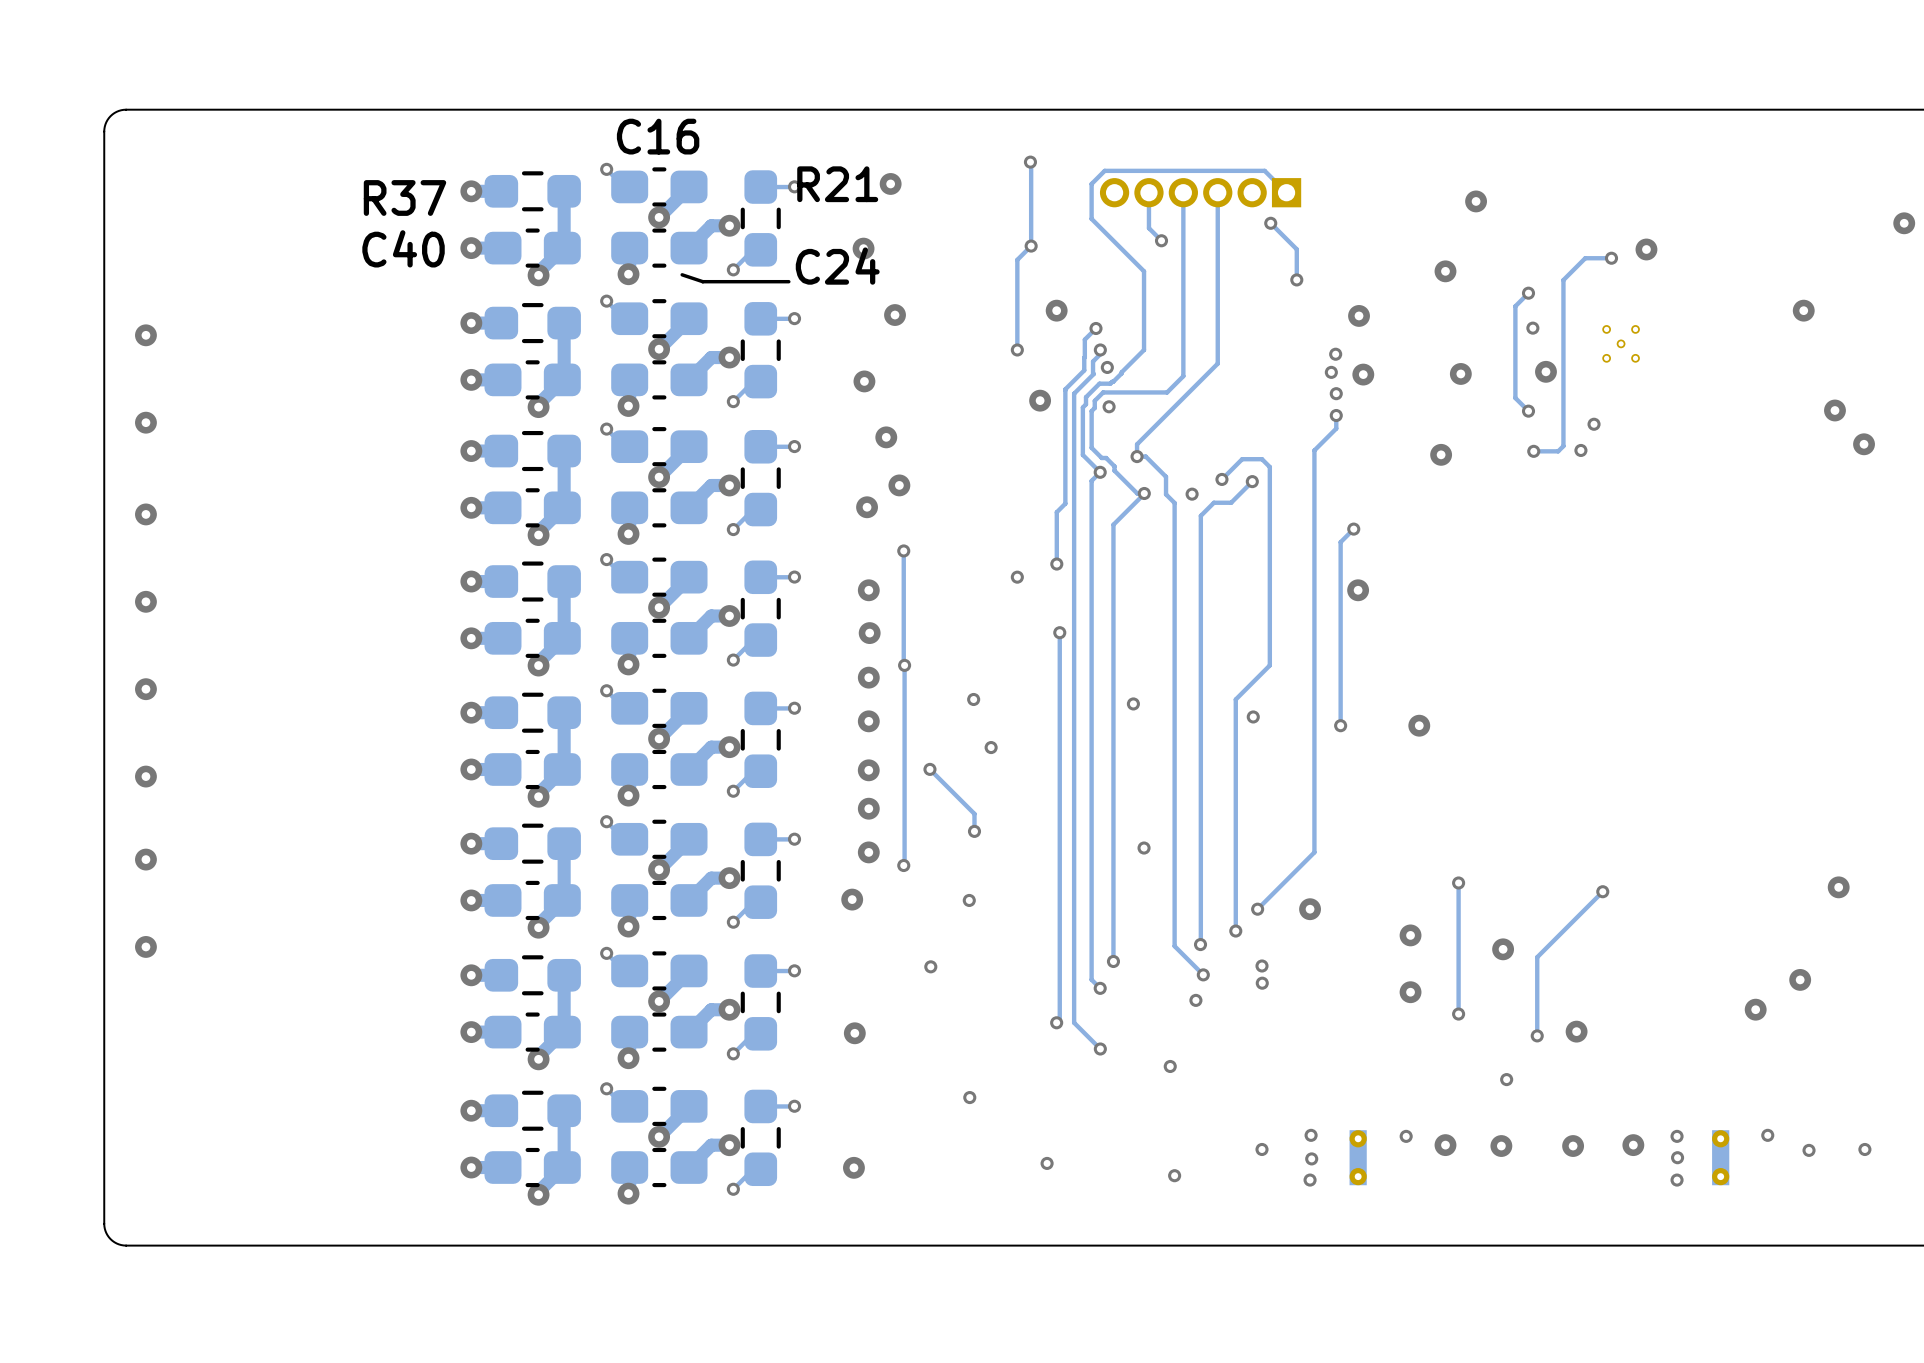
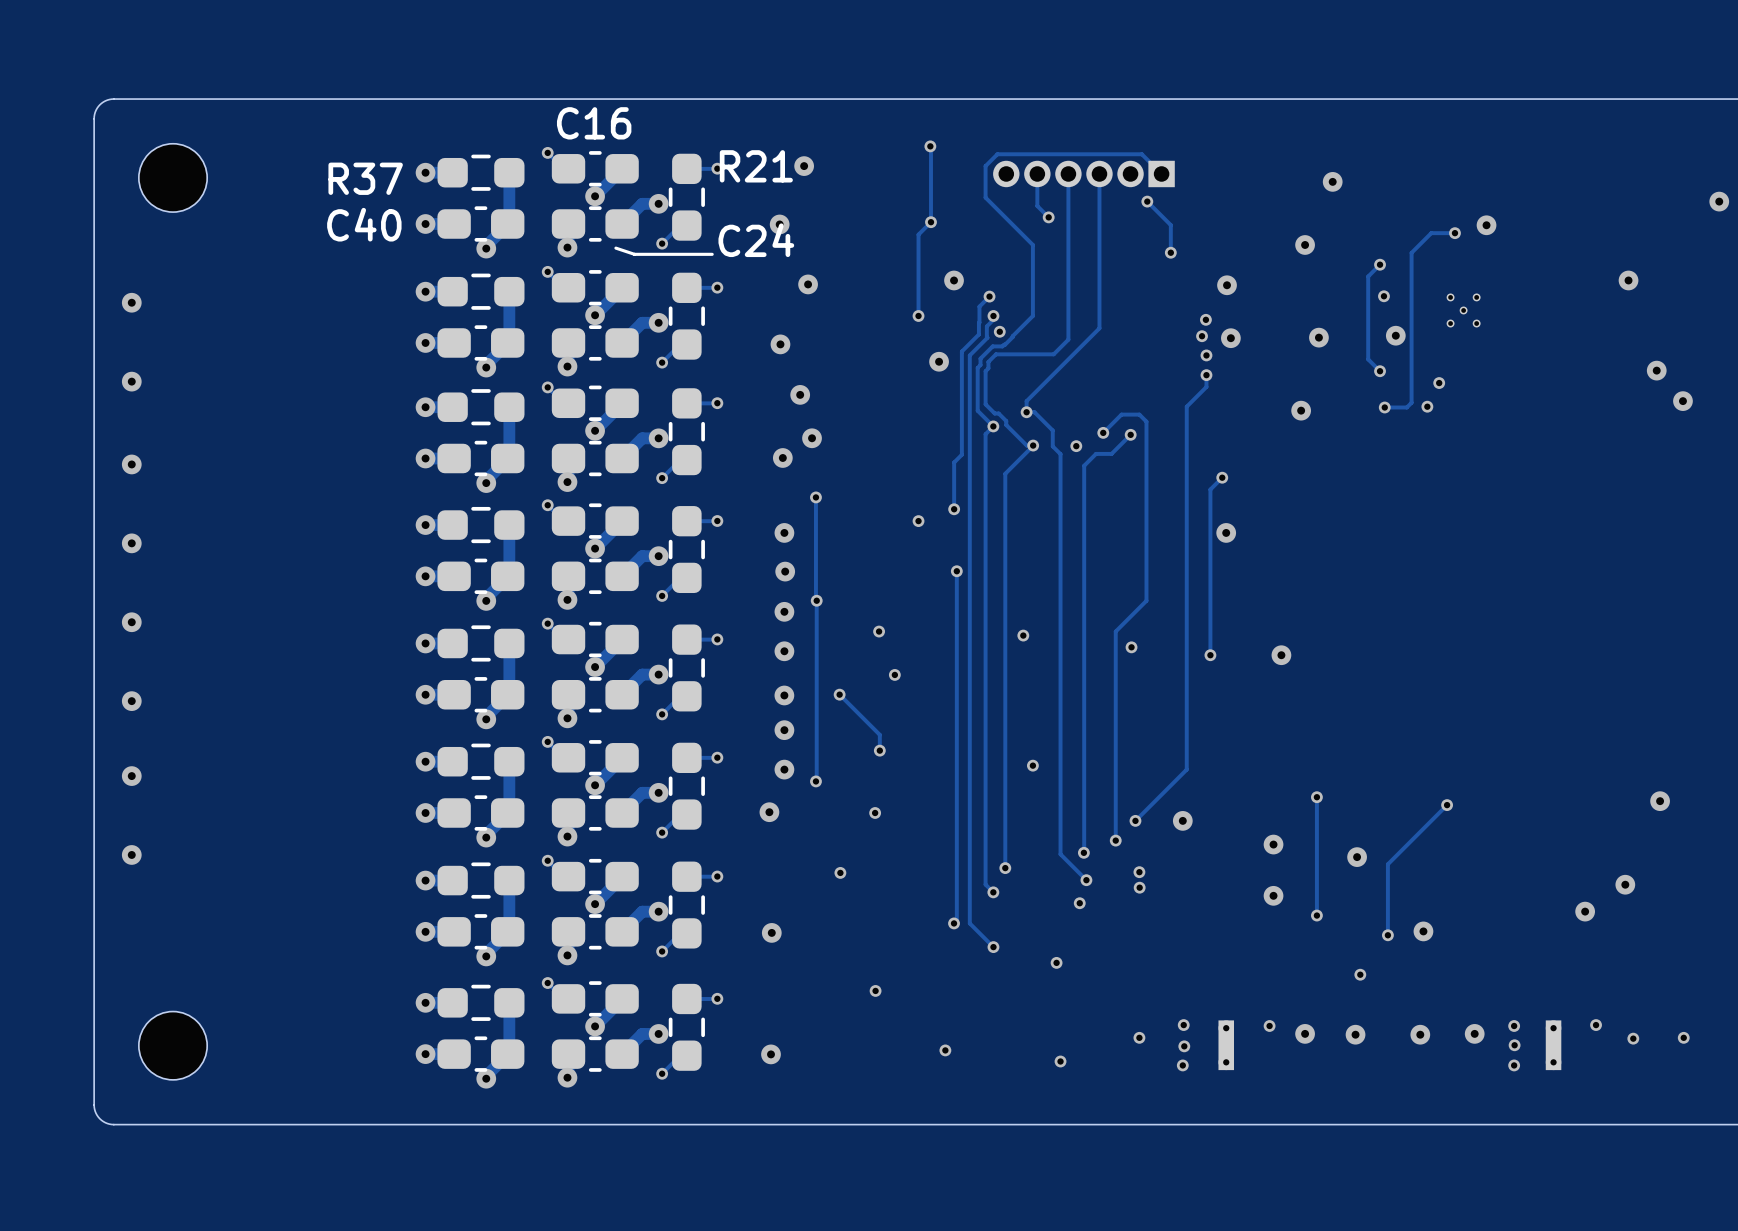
part: none -> (173, 177)
via: (1109, 406) -> none
part: none -> (173, 1045)

